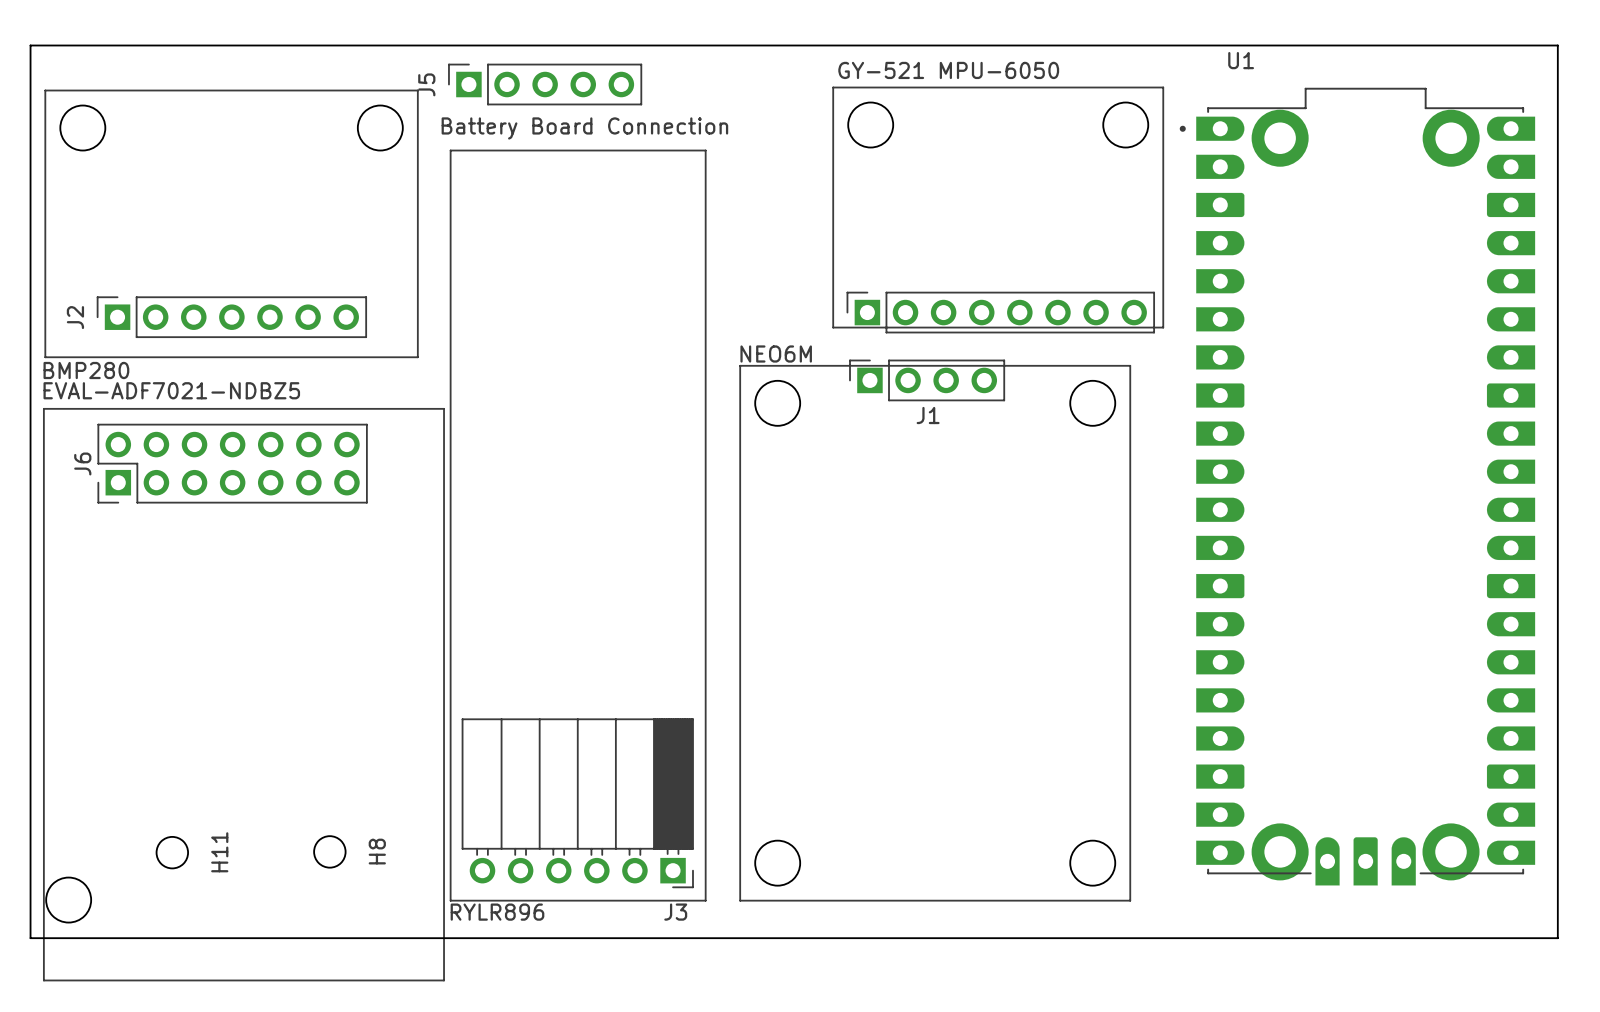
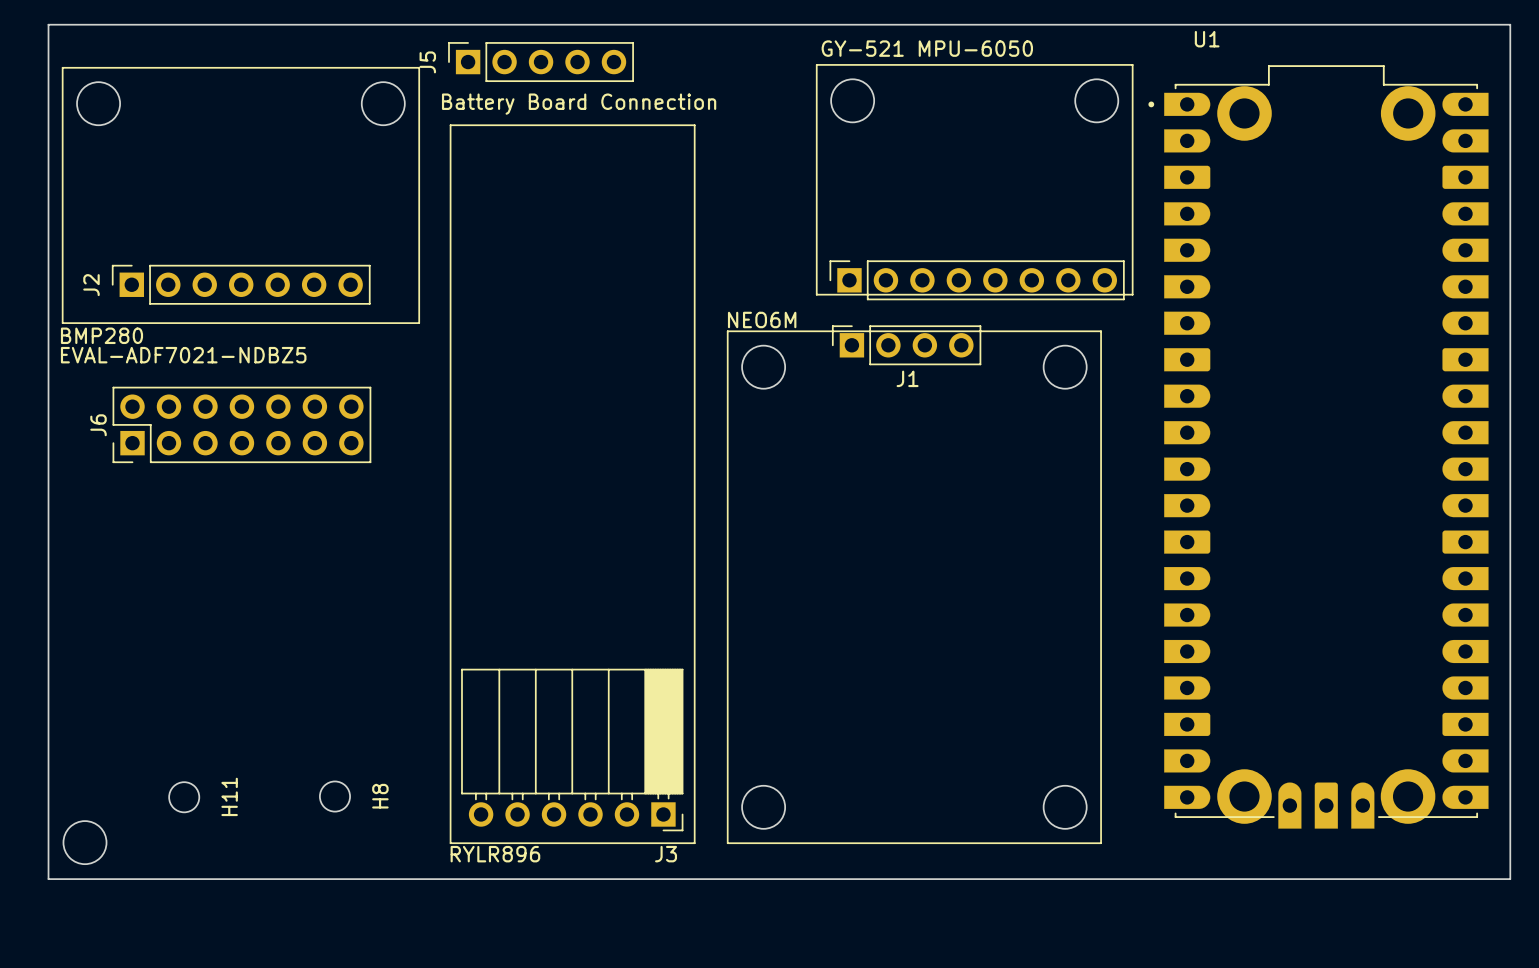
line: (43, 408) (43, 980) (444, 980) (444, 408) (43, 408) -> none

